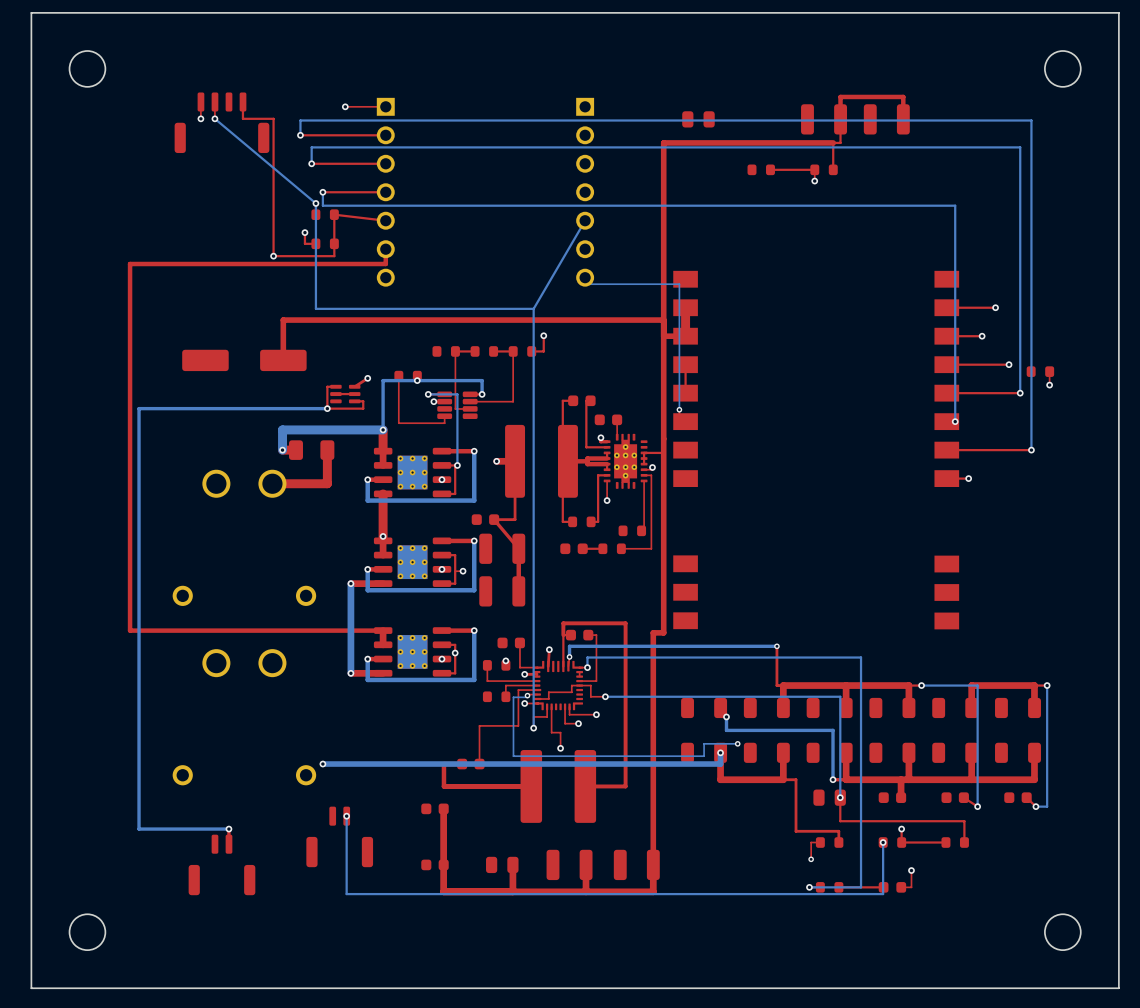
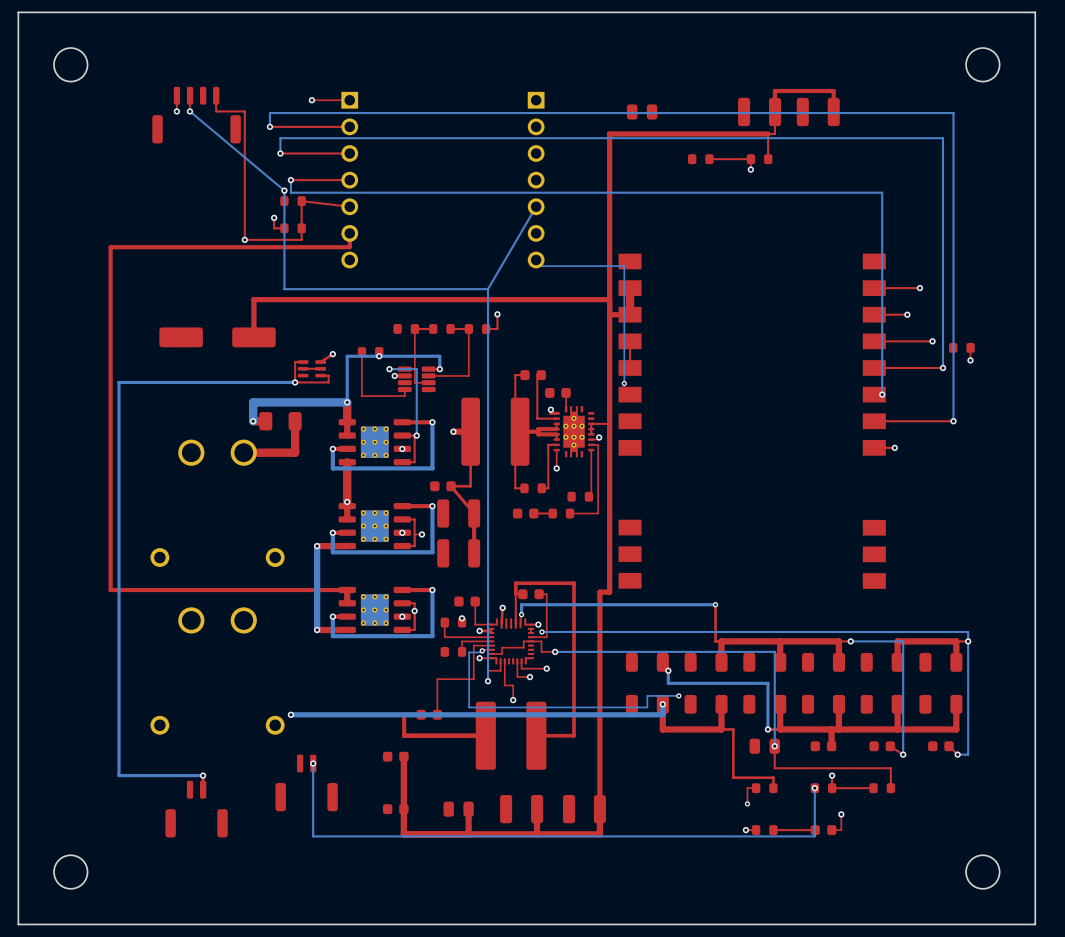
bottom track: (587, 667) (587, 657) (861, 657) (861, 887) (809, 887) -> none
bottom track: none -> (542, 631) (968, 631) (968, 641)
via: none -> (542, 631)

